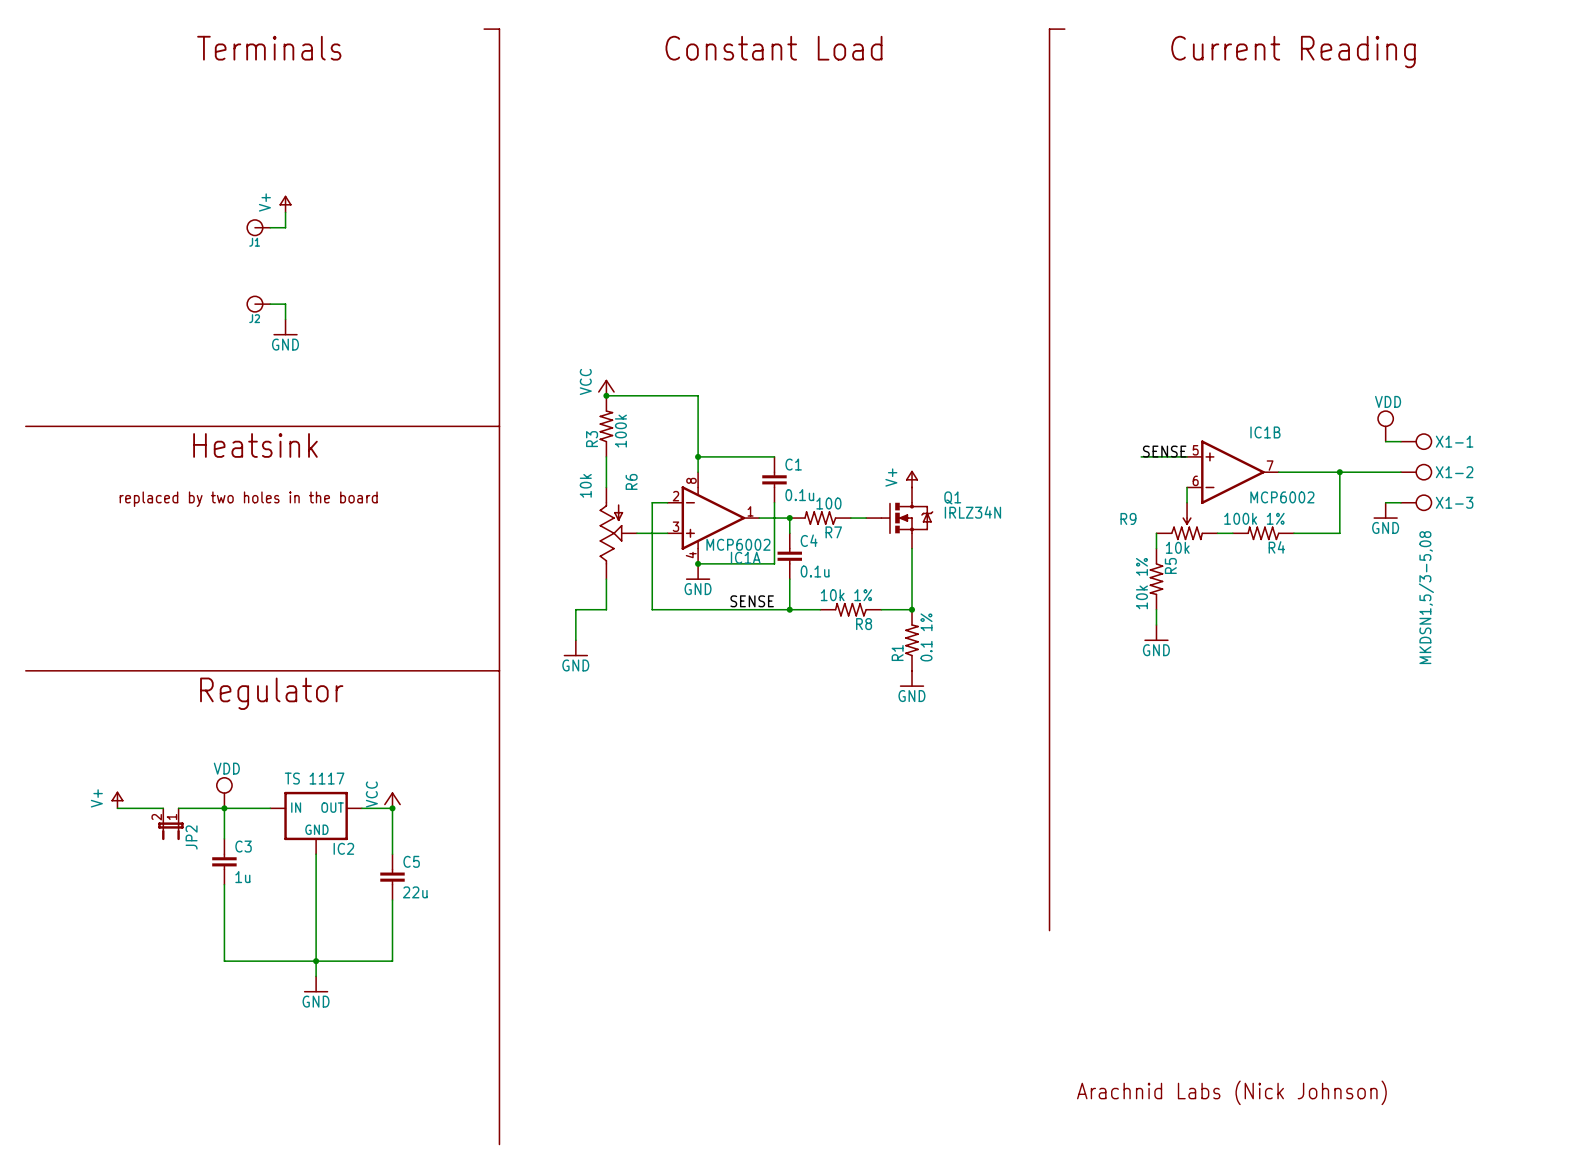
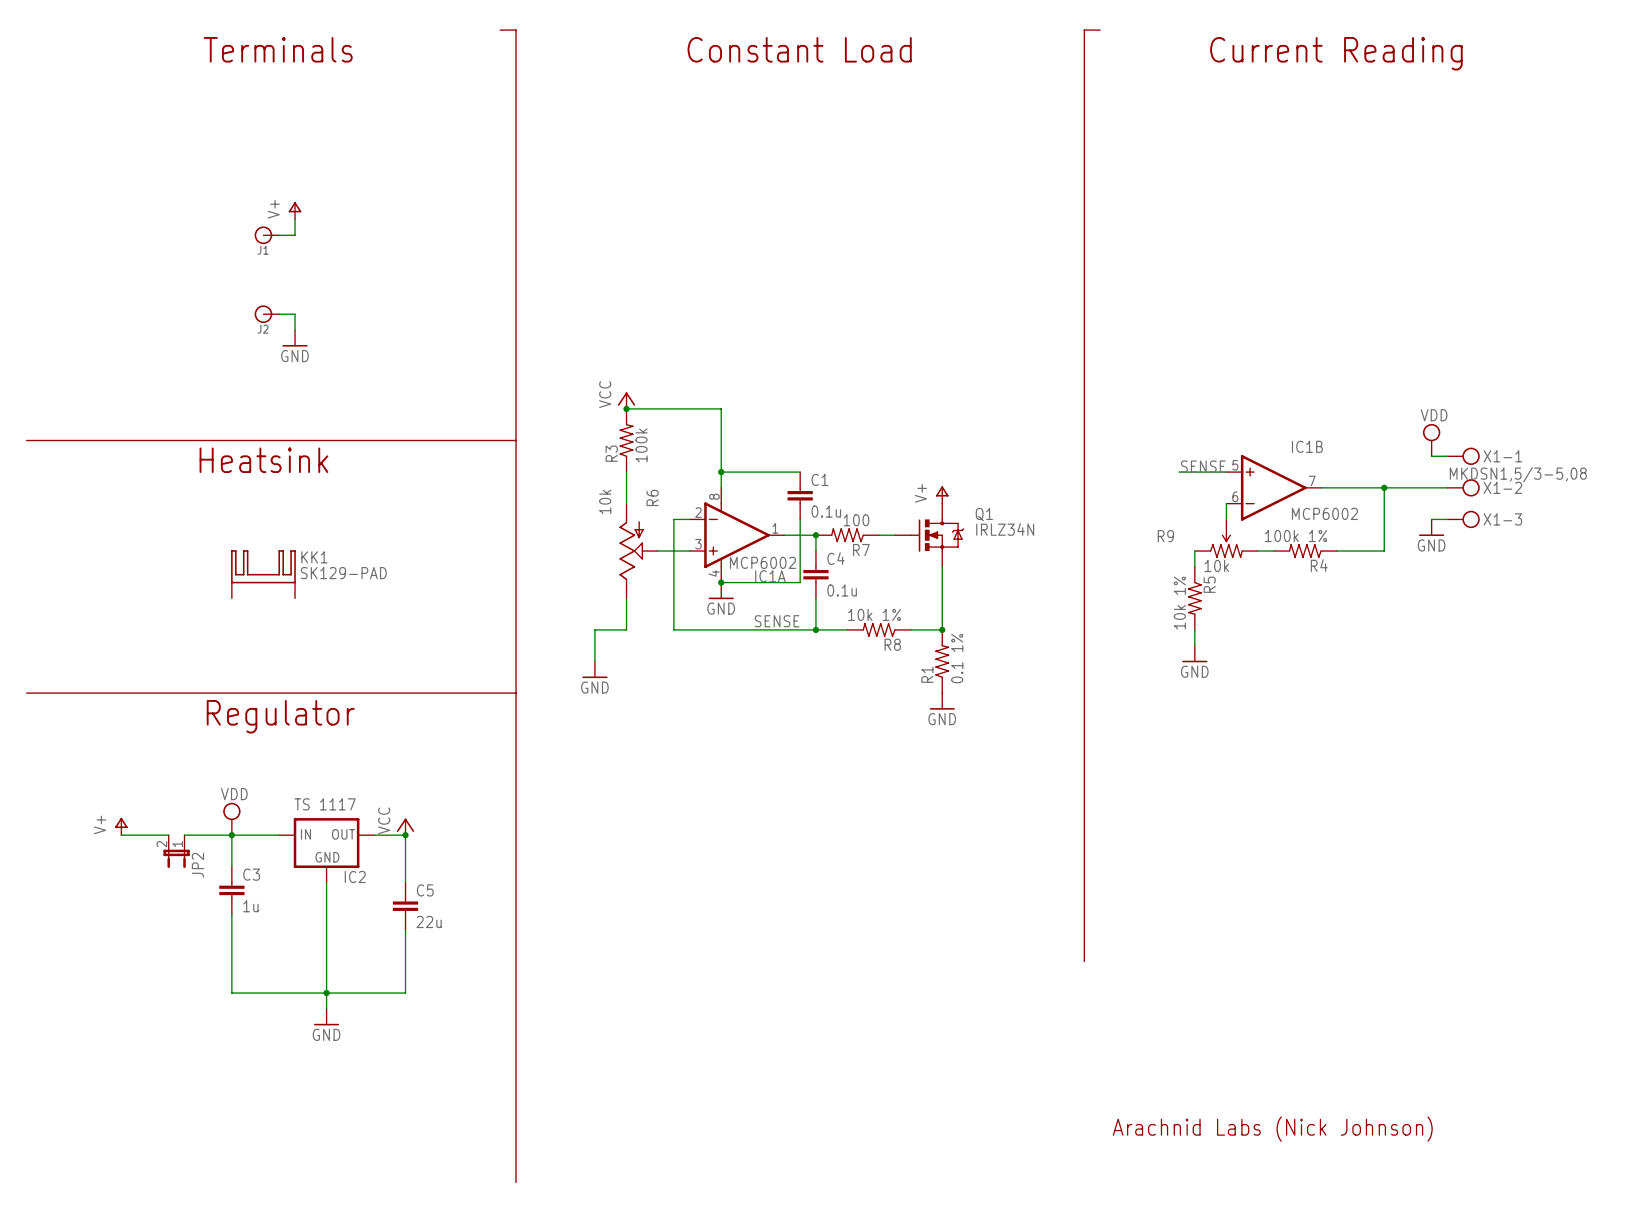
text: replaced by two holes in the board (248, 499) -> none
KK1: none -> SK129-PAD (263, 574)
X1-1 value rotation: 0° (1426, 597) -> 90° clockwise (1518, 474)

